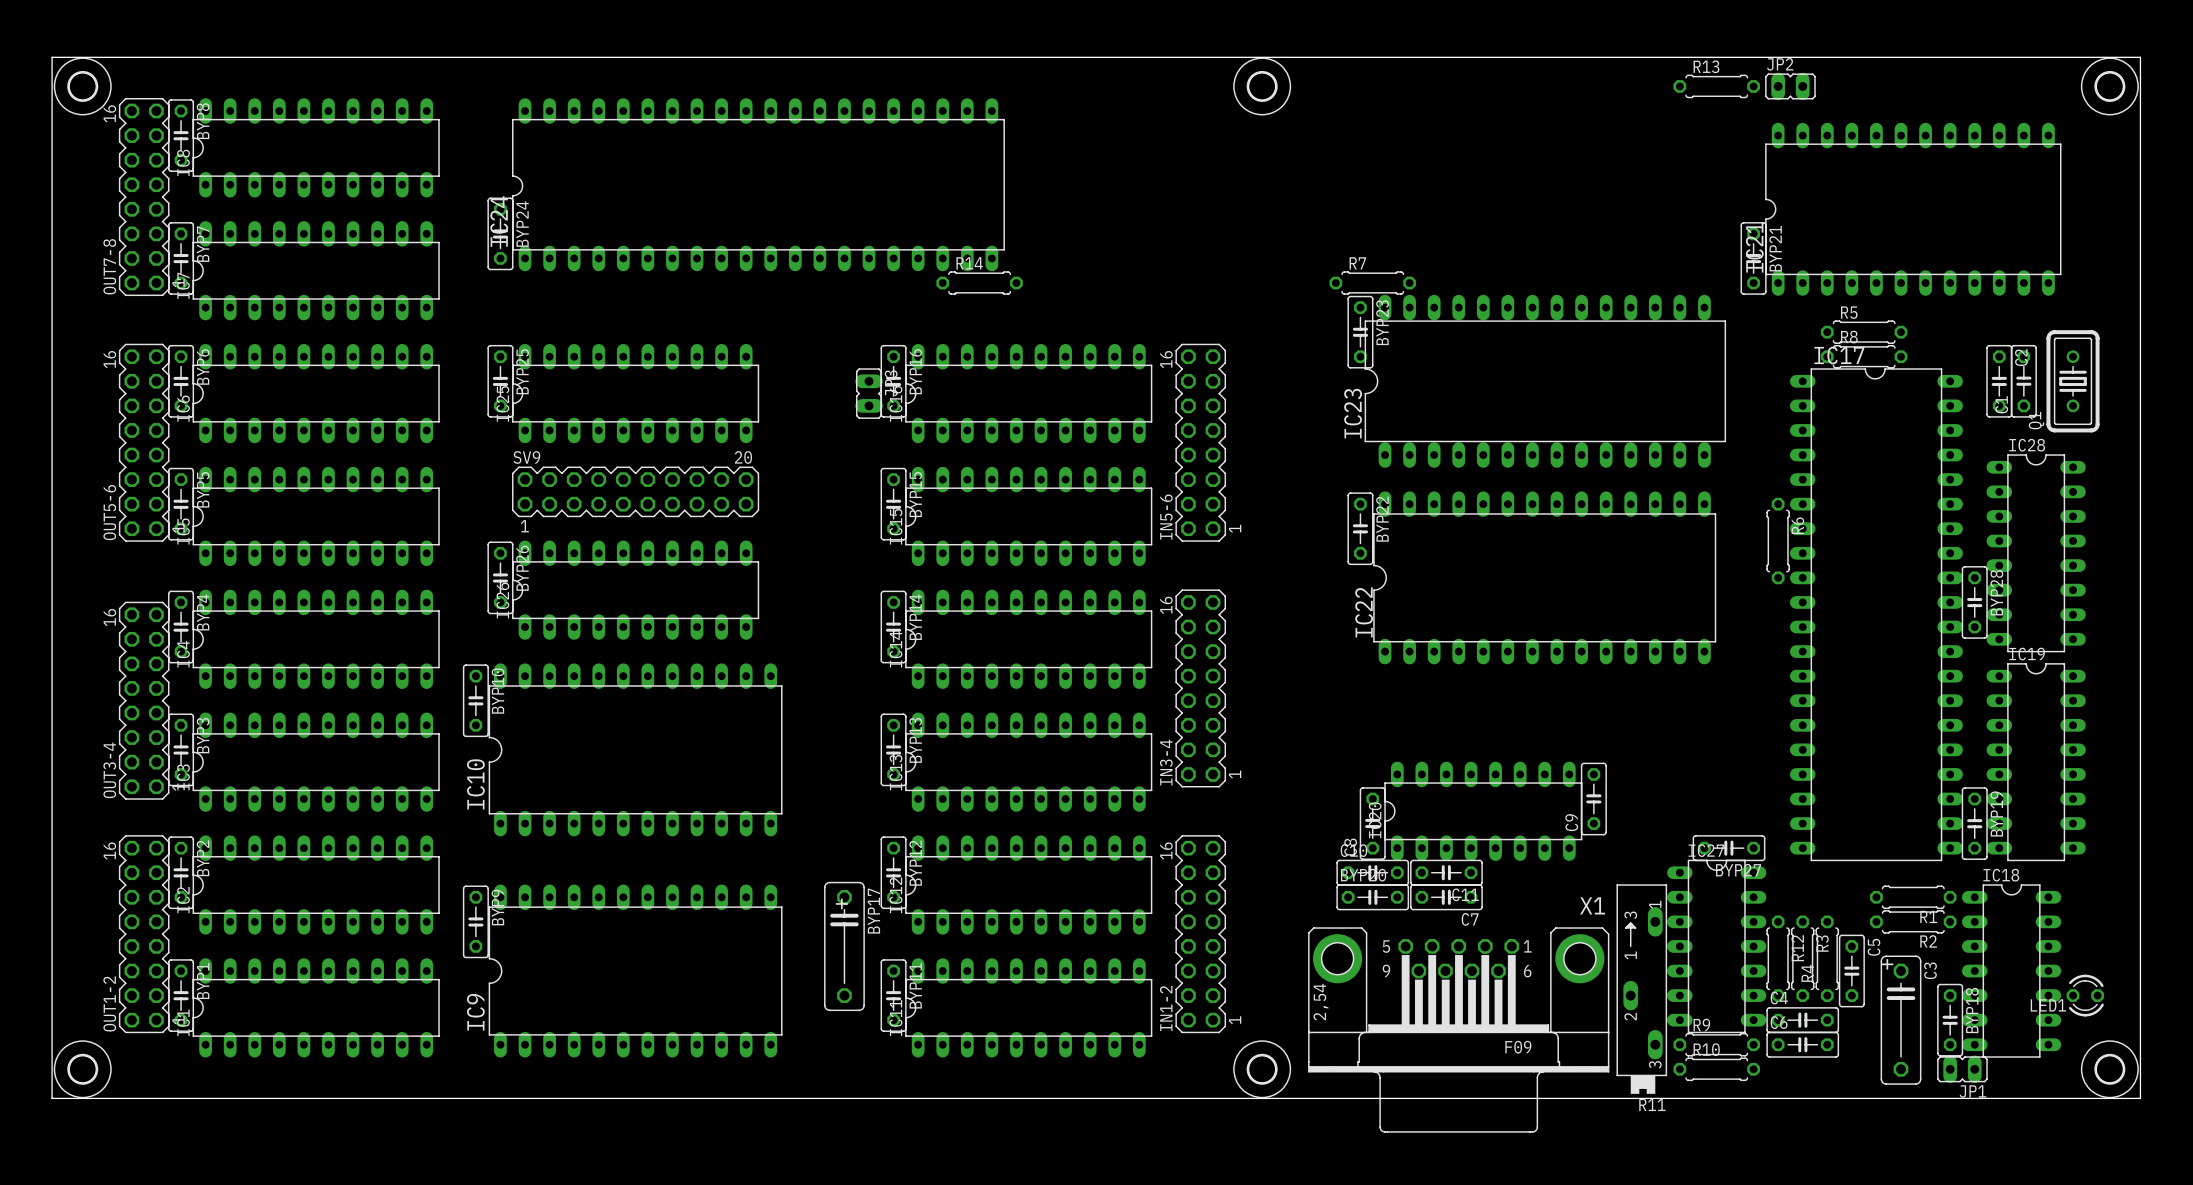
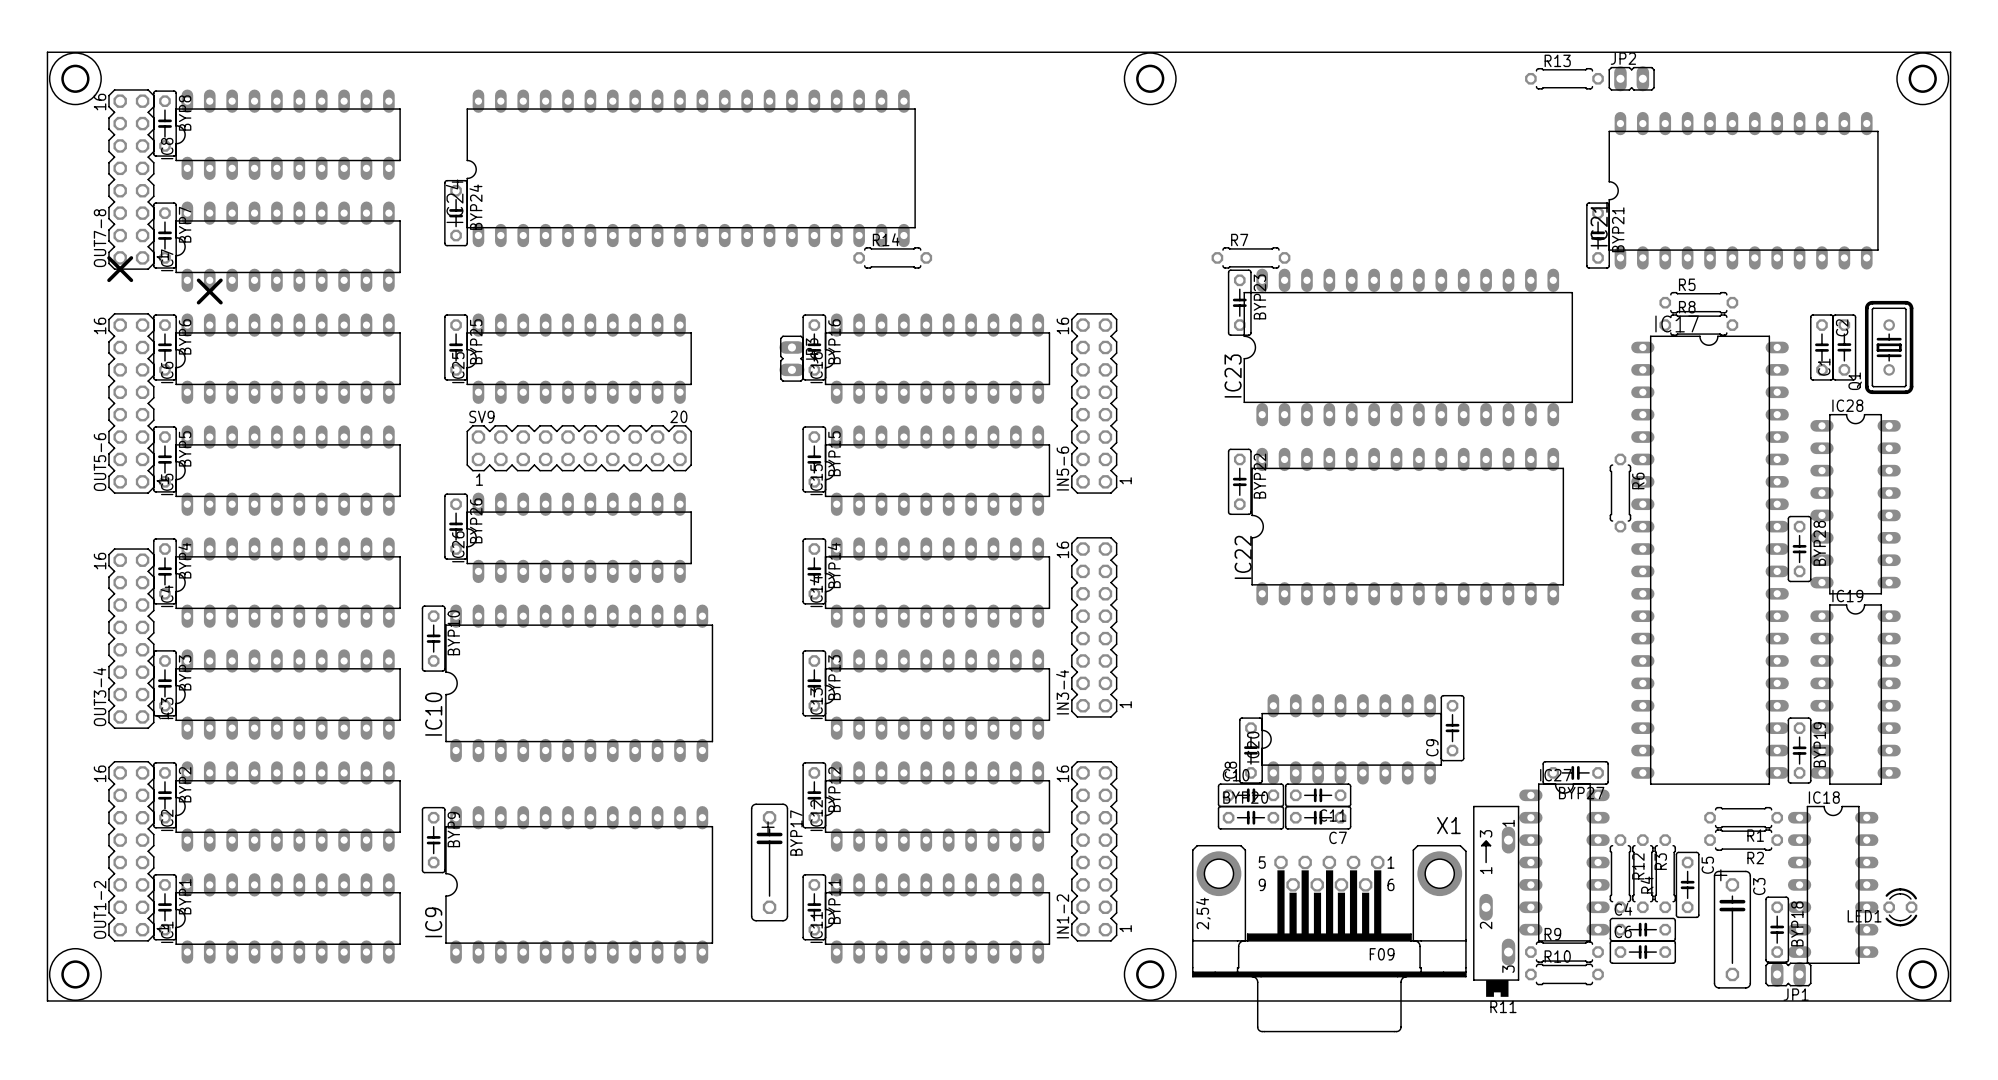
line: none -> (108, 257) (131, 280)
line: none -> (131, 257) (108, 280)
line: none -> (198, 280) (220, 302)
line: none -> (220, 280) (198, 302)

